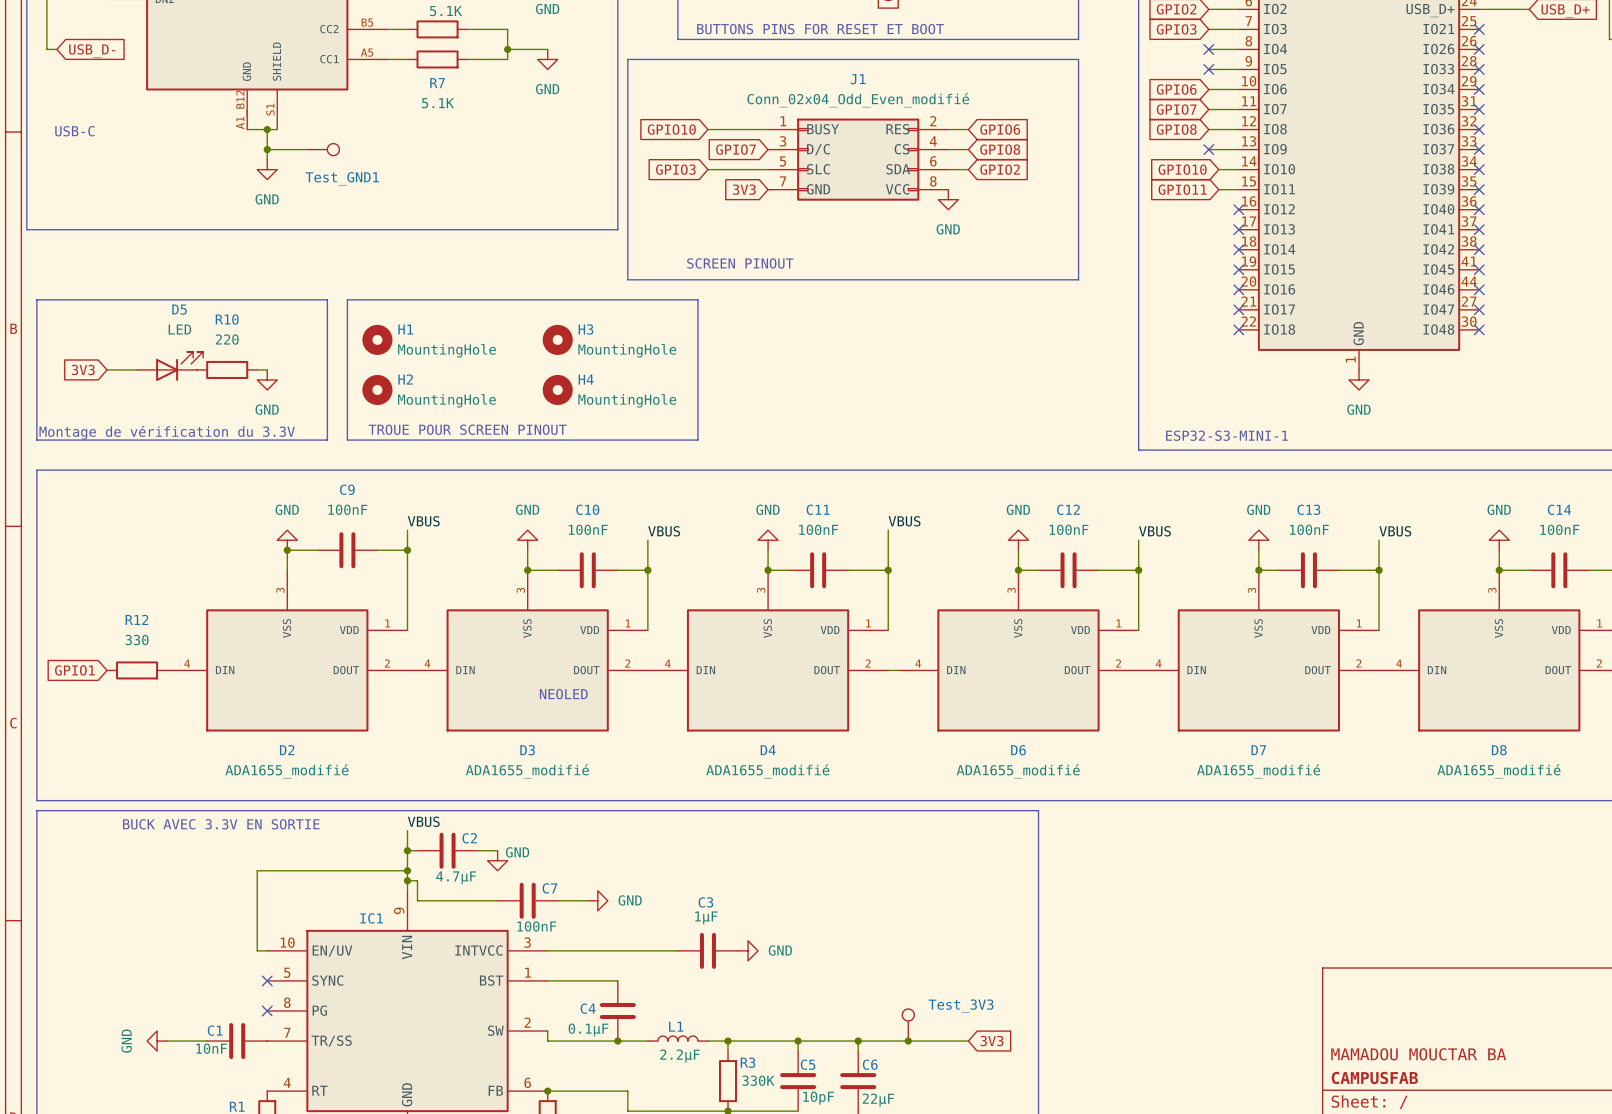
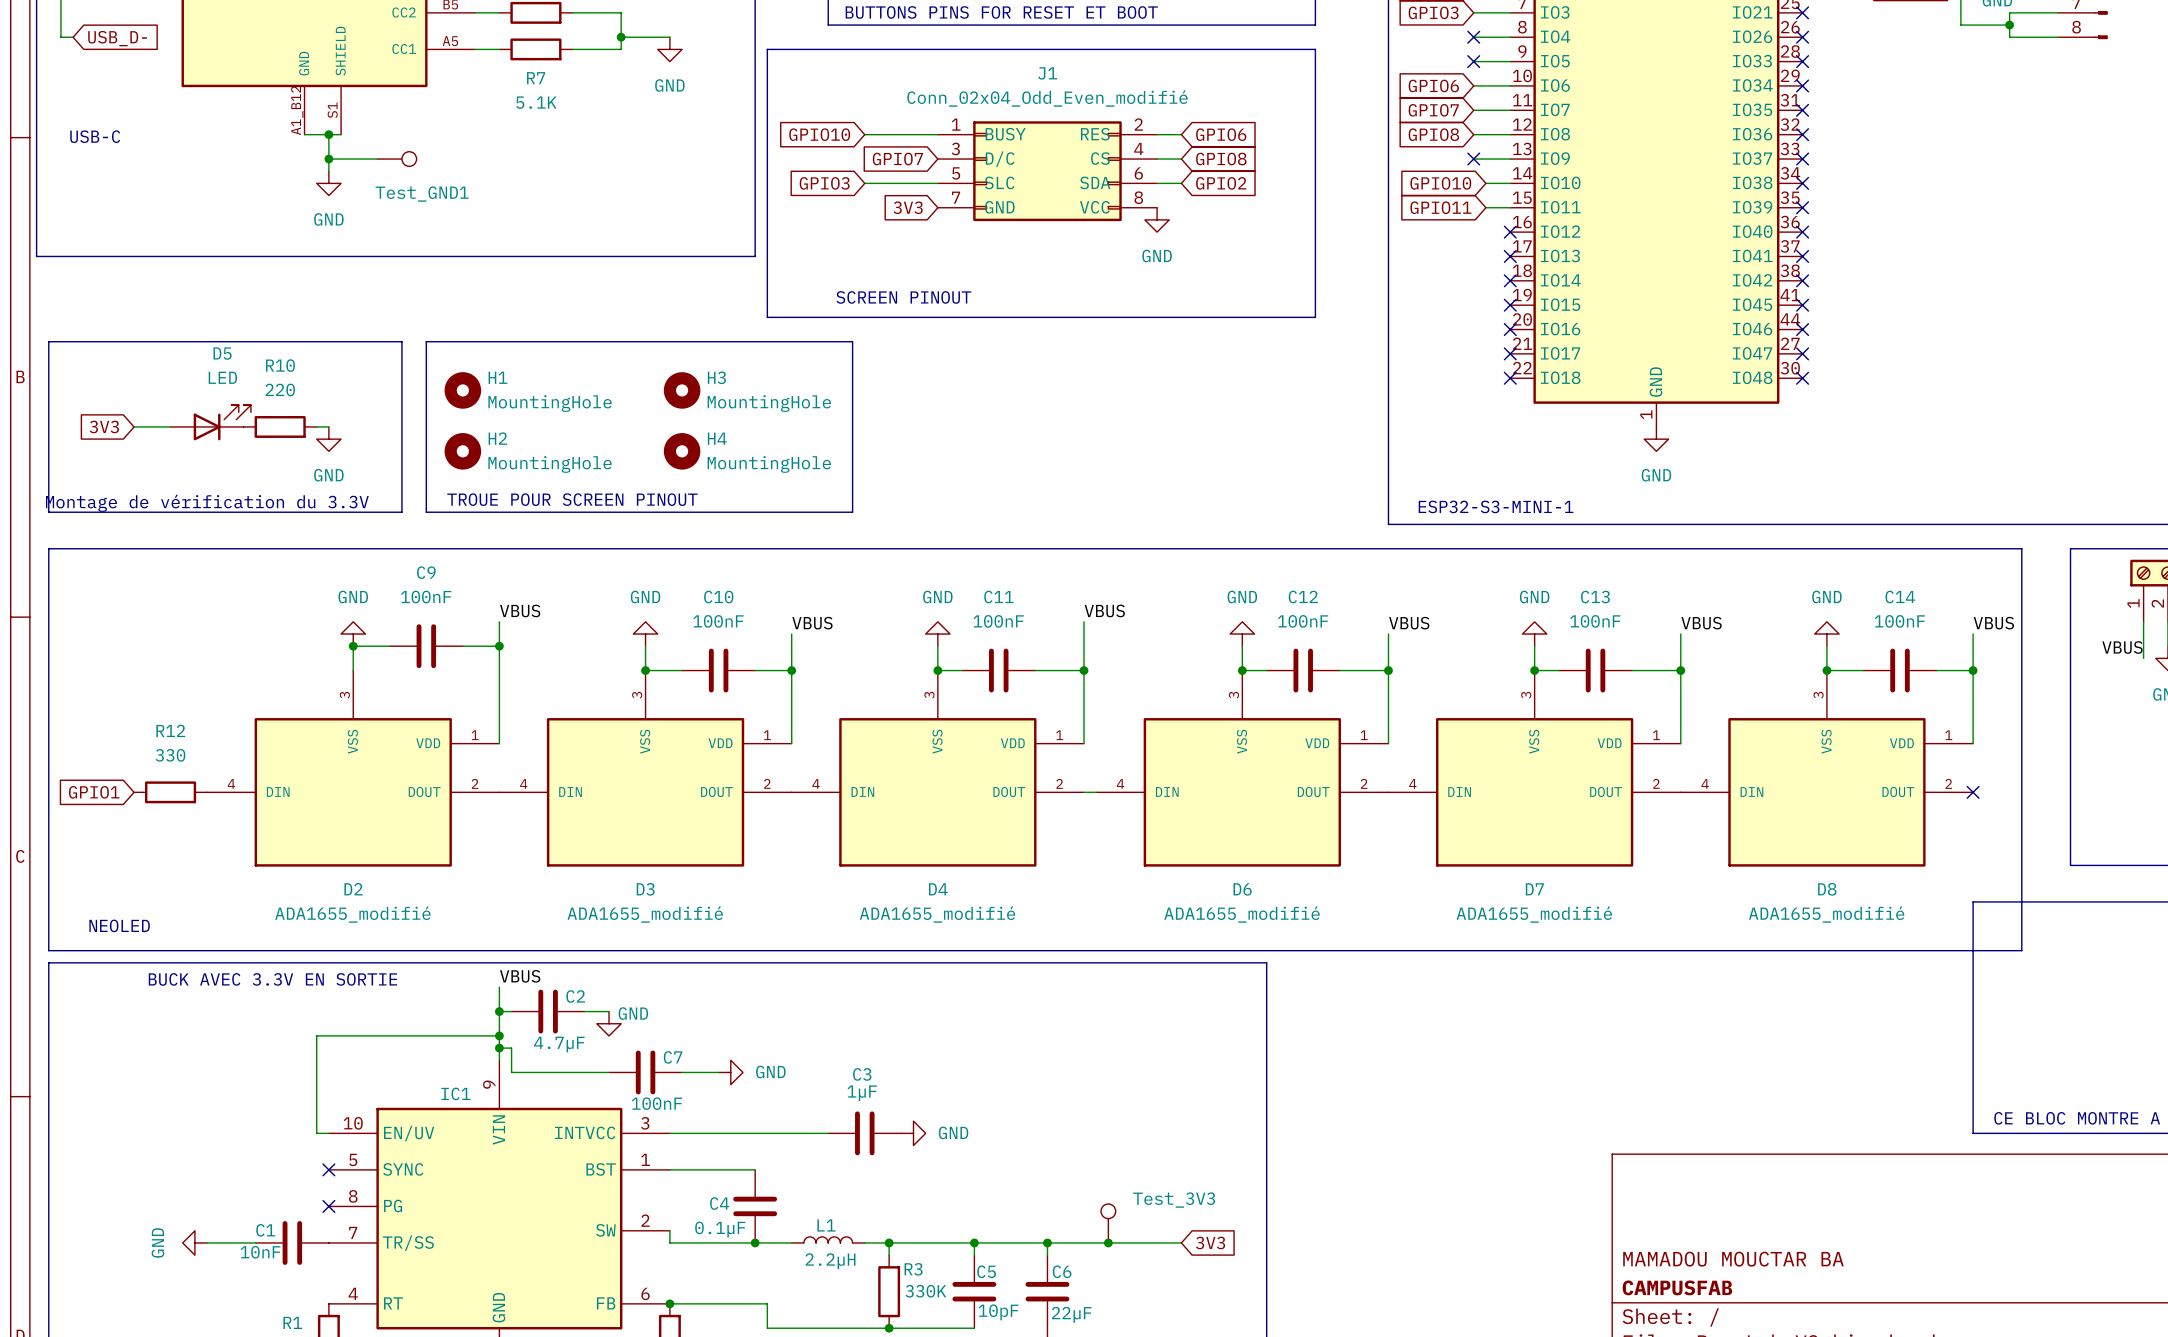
text: NEOLED (563, 694) -> none
text: none -> NEOLED (119, 925)
L1 value: 2.2µF (680, 1056) -> 2.2µH (830, 1261)

